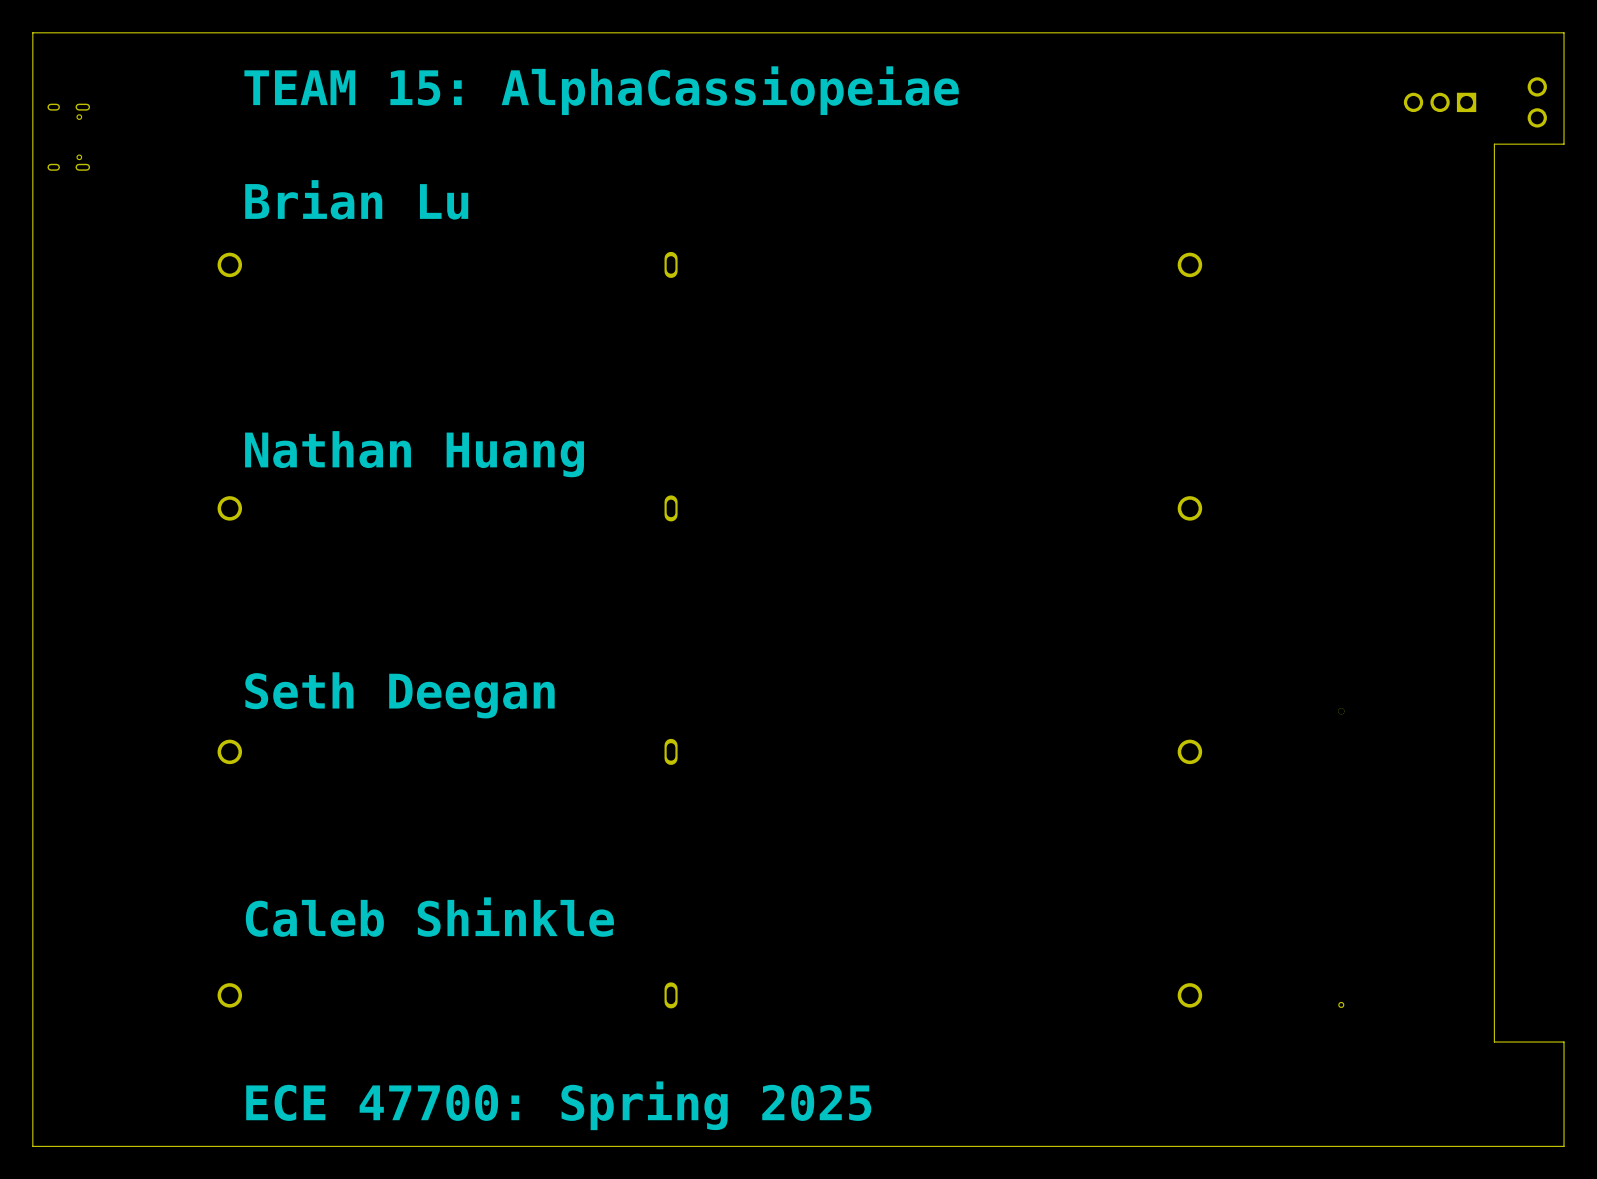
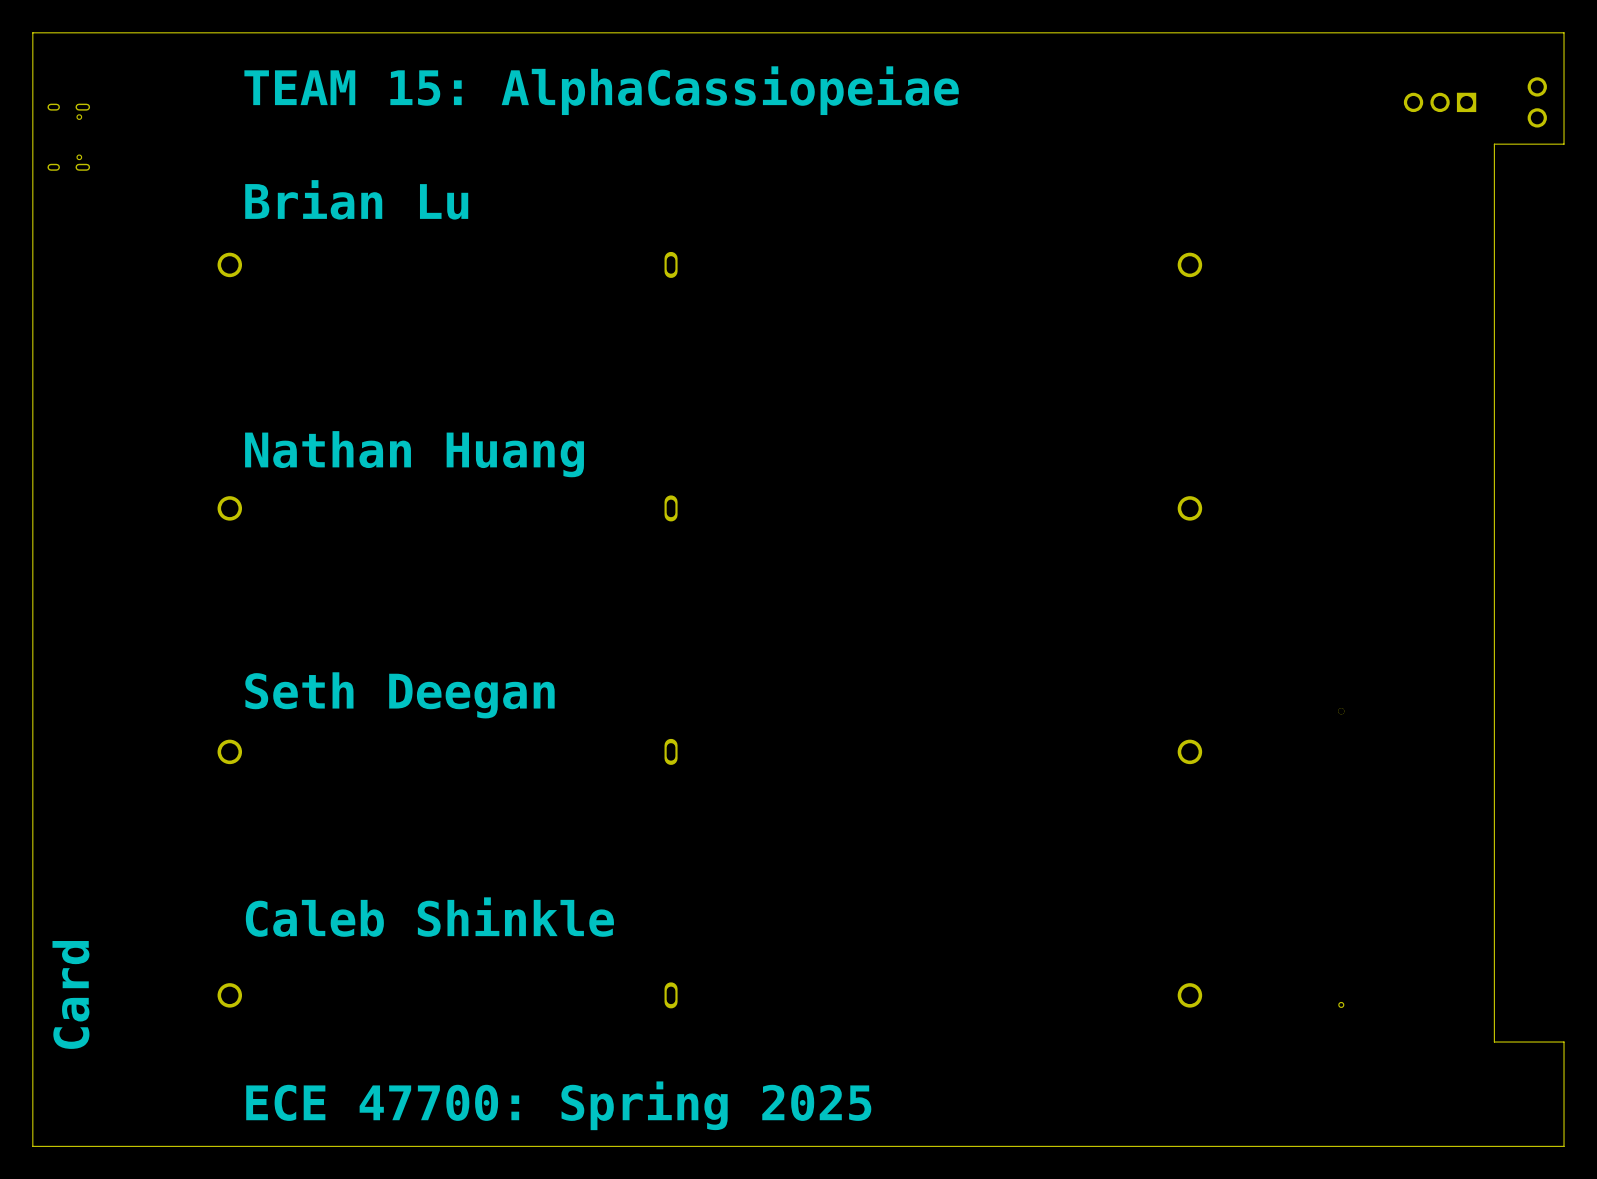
text: none -> Card (70, 994)

